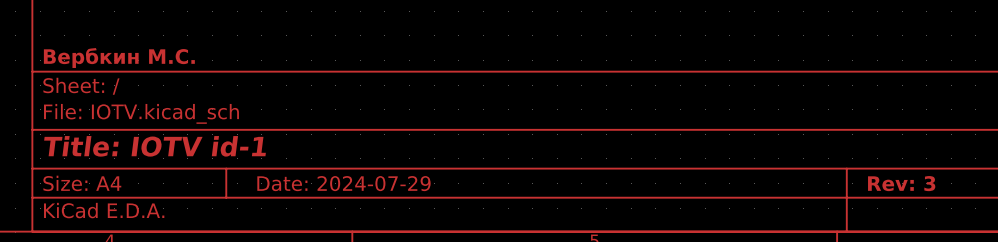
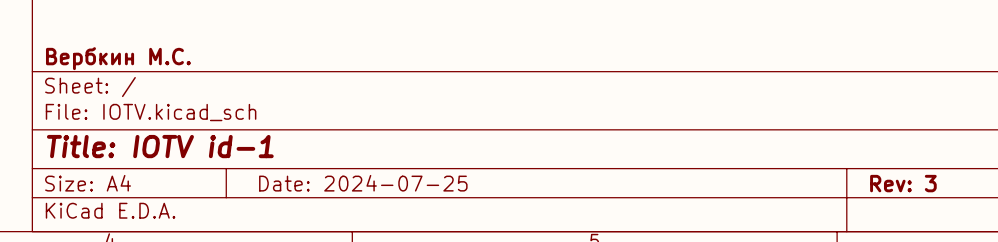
title block: Date: 2024-07-29 (343, 183) -> Date: 2024-07-25 (363, 183)

